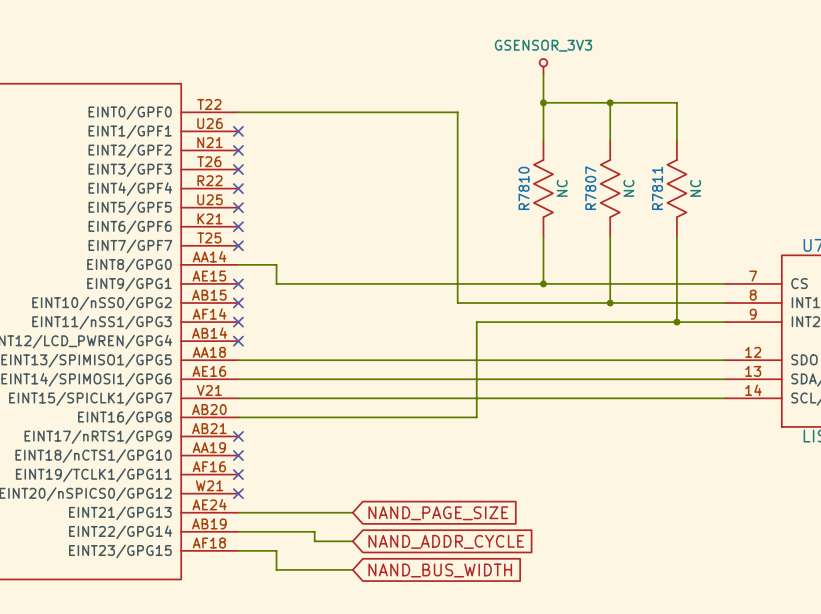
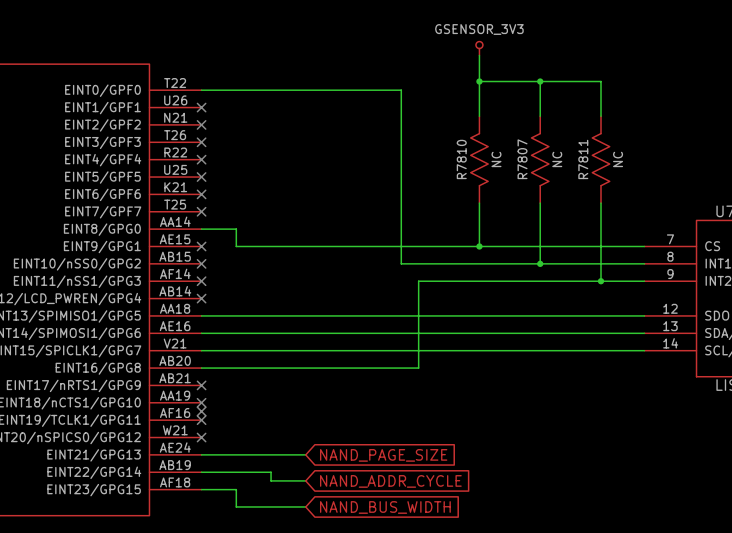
no-connect mark: none -> (201, 411)

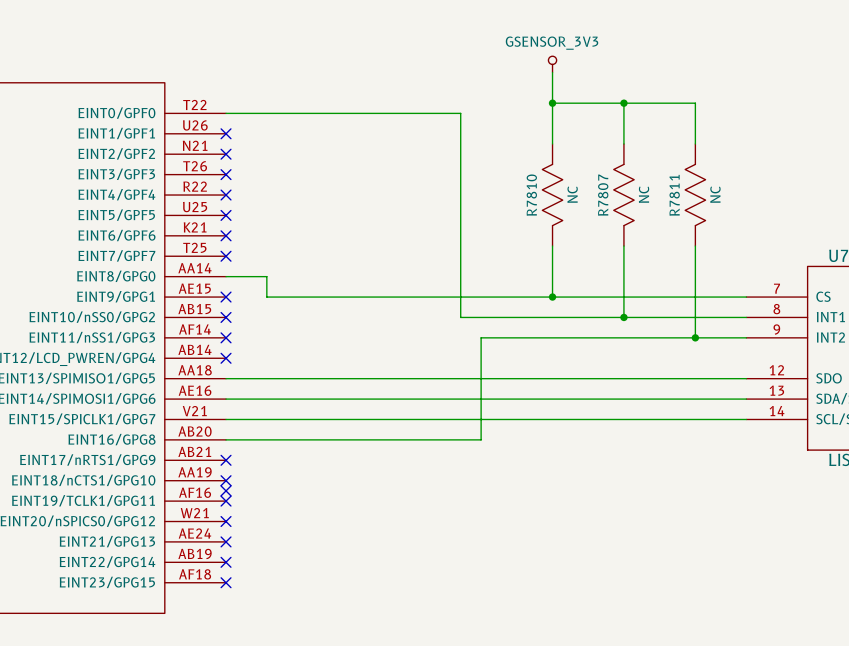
wire: (201, 454) (305, 454) -> none
no-connect mark: none -> (226, 541)
global label: NAND_PAGE_SIZE (383, 455) -> none
wire: (201, 472) (271, 472) (271, 480) (305, 480) -> none
no-connect mark: none -> (226, 562)
global label: NAND_ADDR_CYCLE (390, 481) -> none
wire: (201, 489) (236, 489) (236, 506) (305, 506) -> none
no-connect mark: none -> (226, 582)
global label: NAND_BUS_WIDTH (385, 507) -> none

